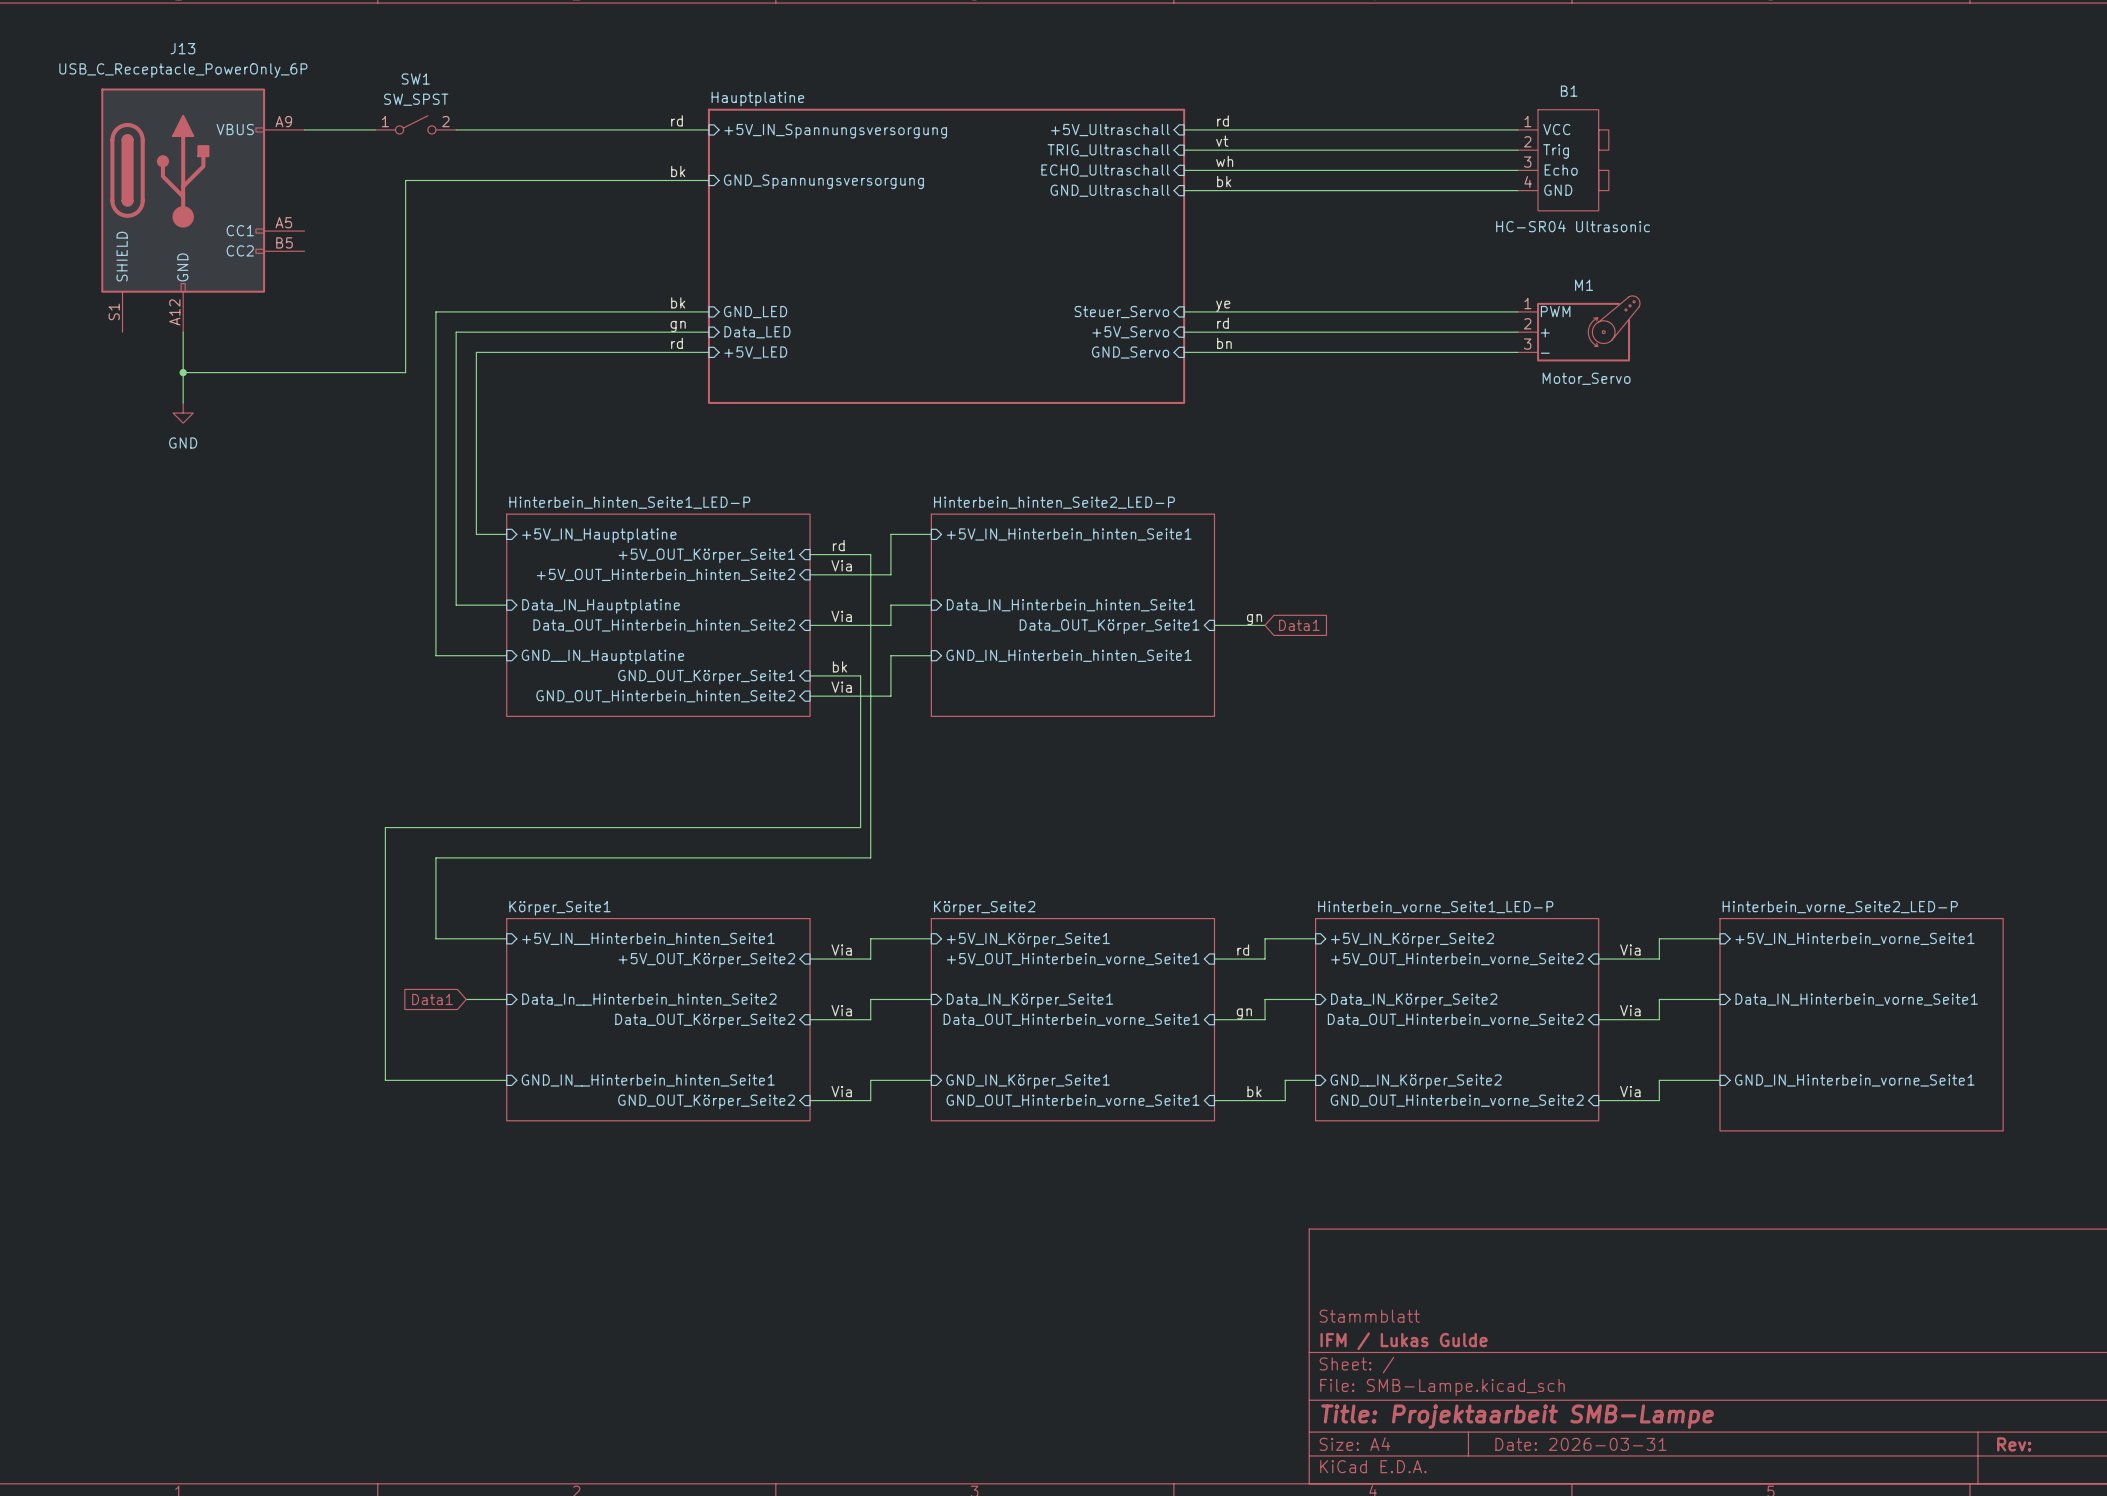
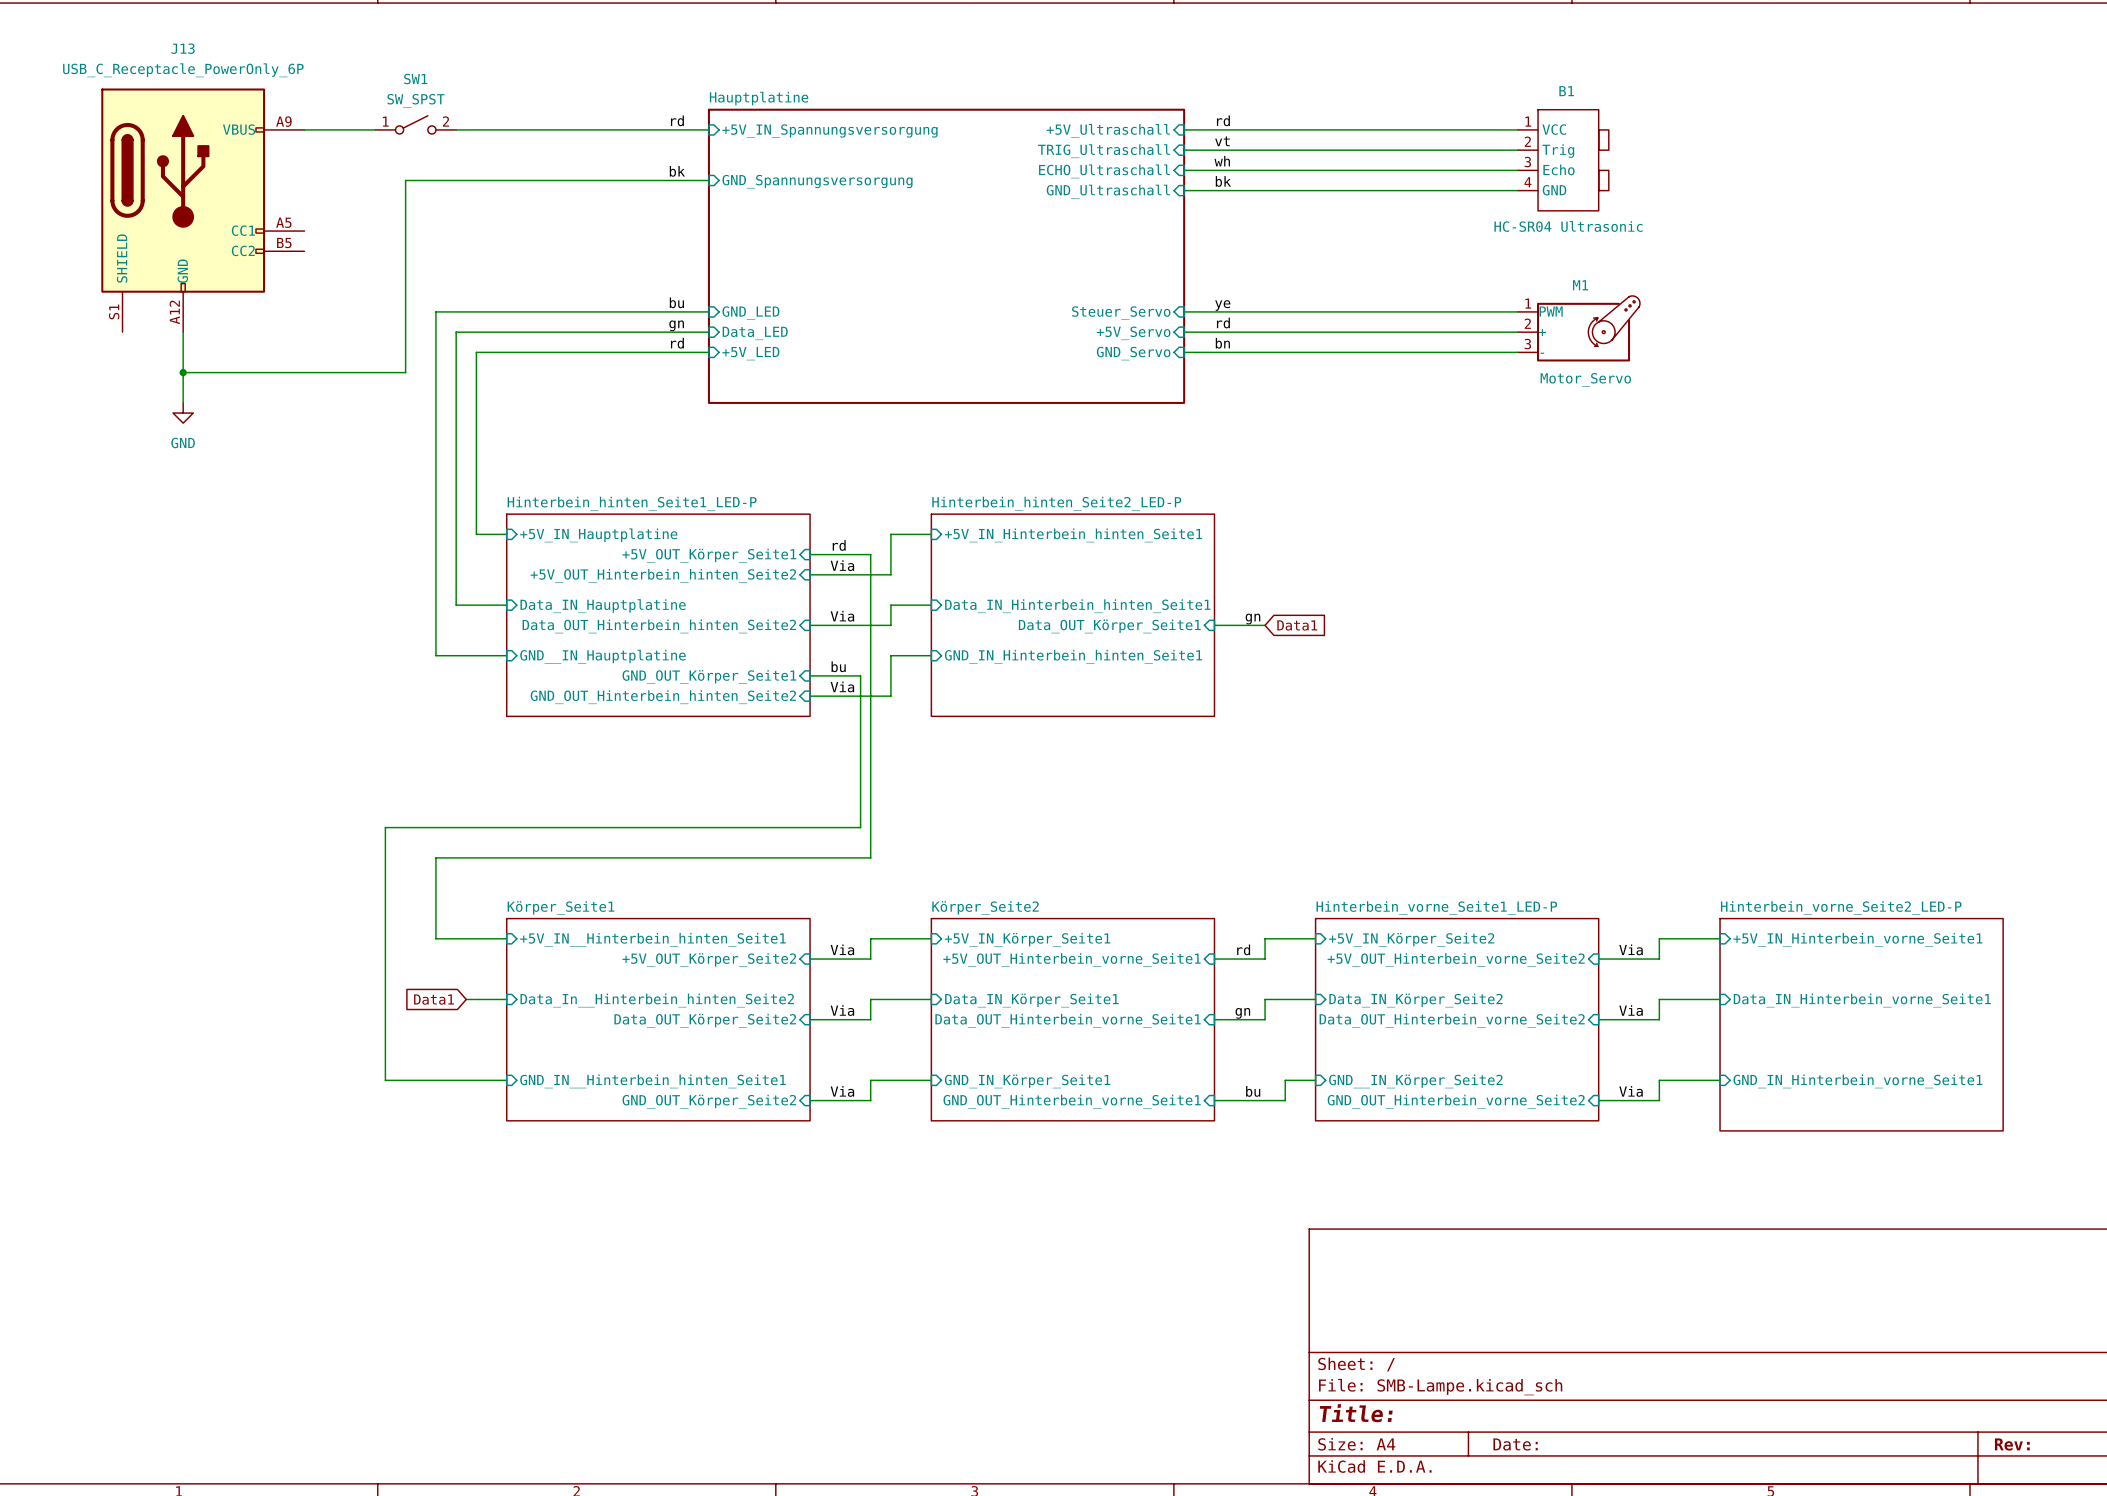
label: bk (678, 302) -> bu (676, 302)
label: bk (839, 666) -> bu (838, 666)
label: bk (1254, 1091) -> bu (1253, 1091)
title block: Stammblatt (1369, 1316) -> none
title block: IFM / Lukas Gulde (1404, 1341) -> none
title block: Title: Projektaarbeit SMB-Lampe (1517, 1416) -> Title: (1356, 1413)
title block: Date: 2026-03-31 (1580, 1444) -> Date: (1515, 1444)

